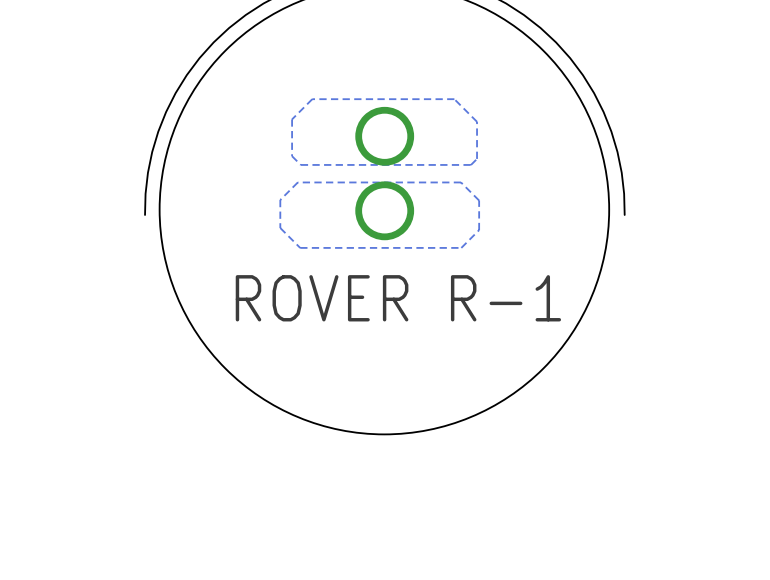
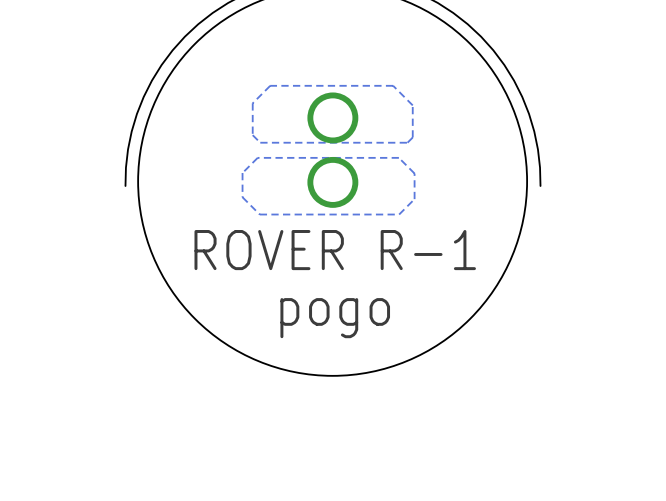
text position: ROVER R-1 (398, 298) -> ROVER R-1 (335, 250)
text: none -> pogo (335, 318)

